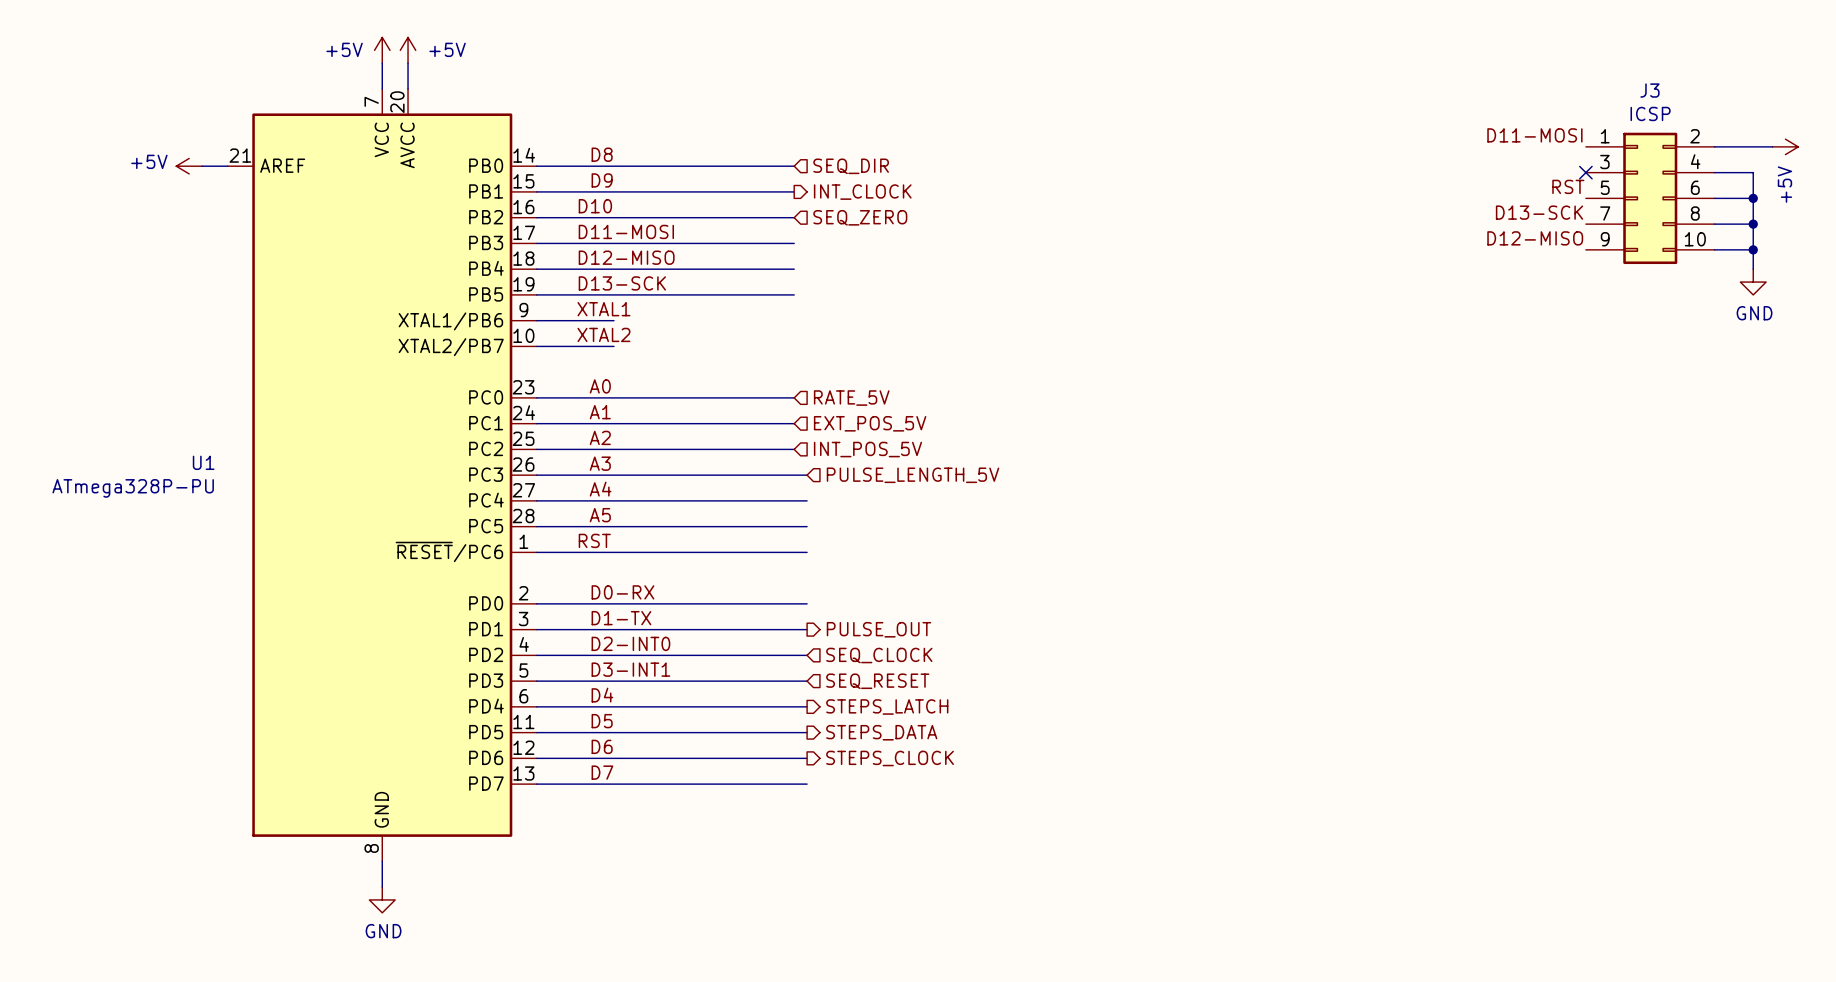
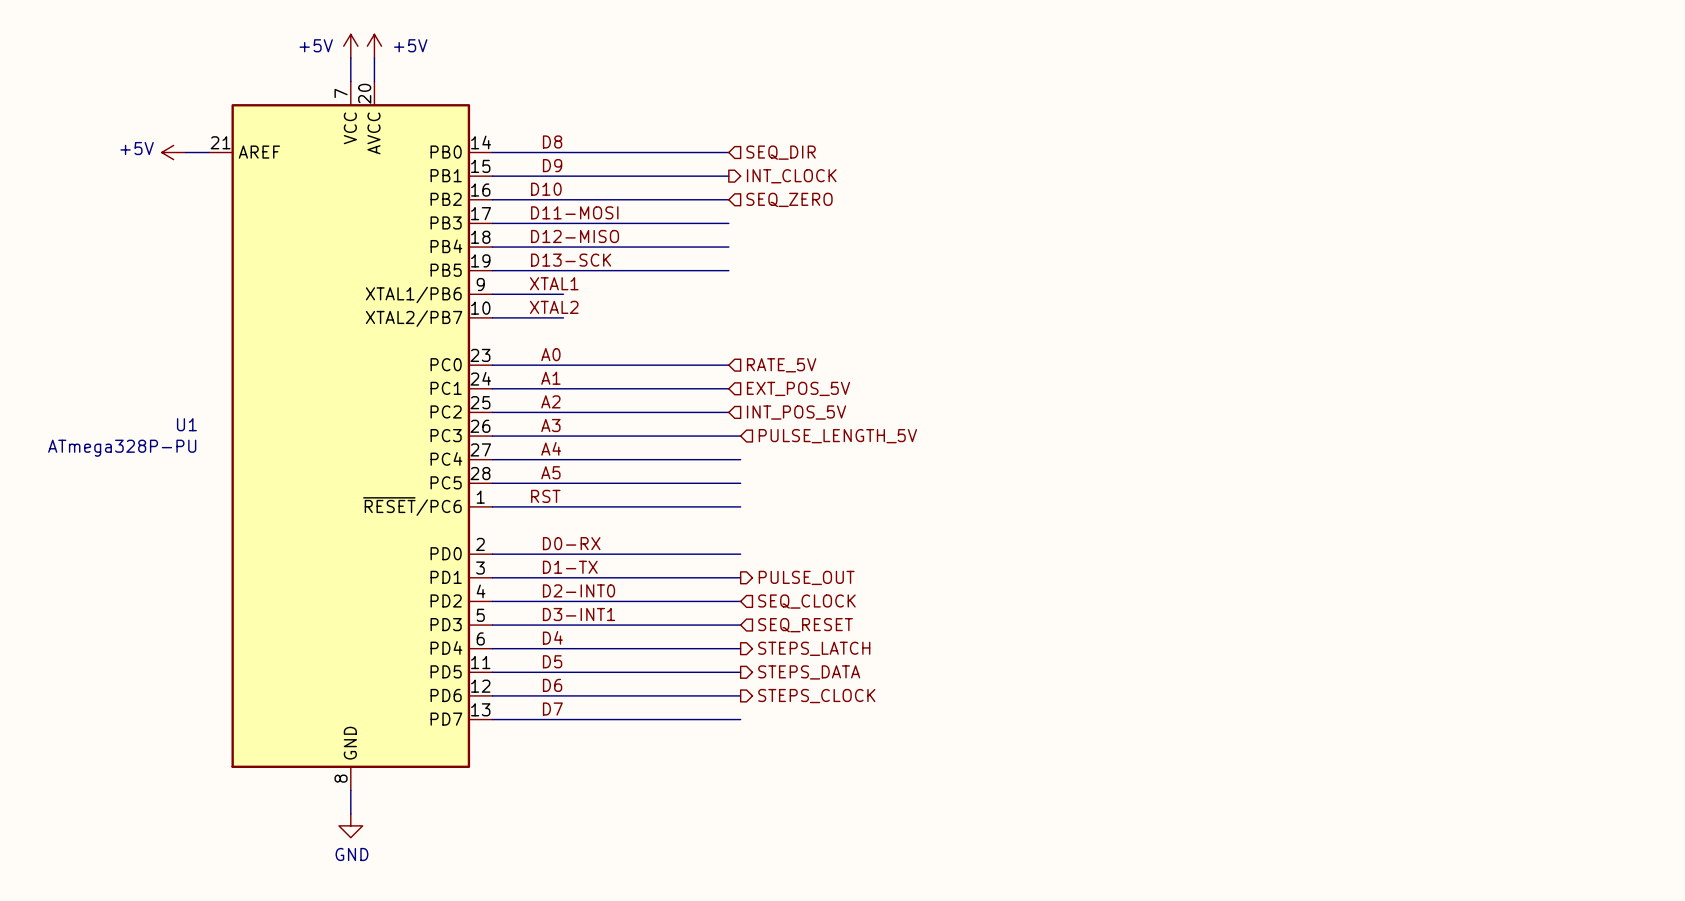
label: D11-MOSI (1534, 135) -> none
wire: (1714, 146) (1772, 146) -> none
power symbol: +5V (1785, 146) -> none
no-connect mark: (1585, 172) -> none
wire: (1714, 172) (1753, 172) (1753, 269) -> none
label: RST (1568, 186) -> none
J3: ICSP (1650, 198) -> none
wire: (1714, 198) (1753, 198) -> none
junction: (1753, 198) -> none
label: D13-SCK (1539, 212) -> none
wire: (1714, 224) (1753, 224) -> none
junction: (1753, 224) -> none
label: D12-MISO (1535, 238) -> none
wire: (1714, 249) (1753, 249) -> none
junction: (1753, 249) -> none
power symbol: GND (1753, 282) -> none

